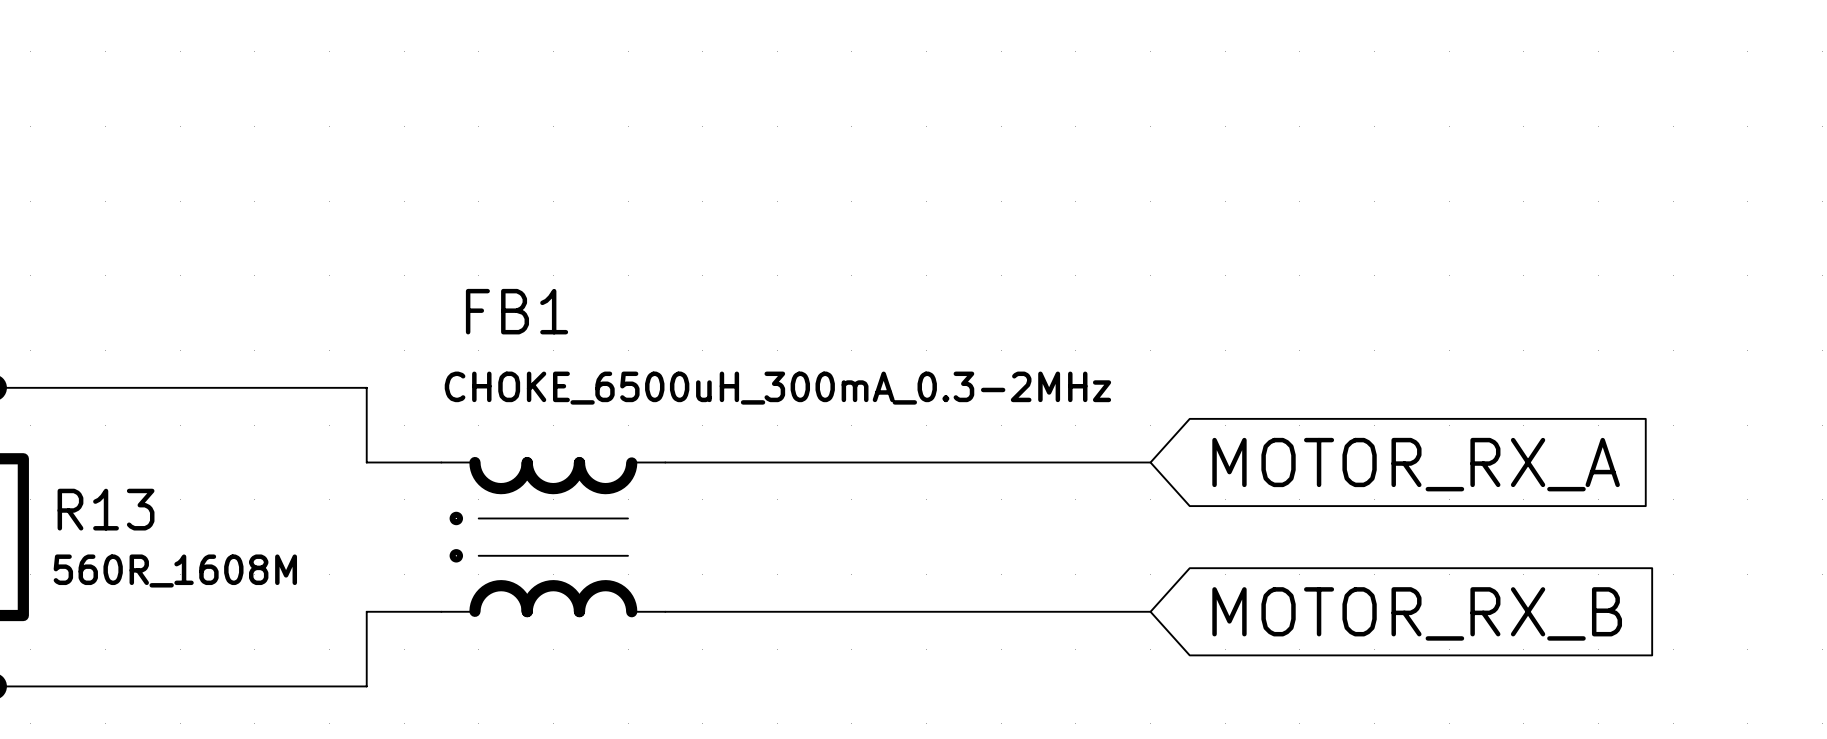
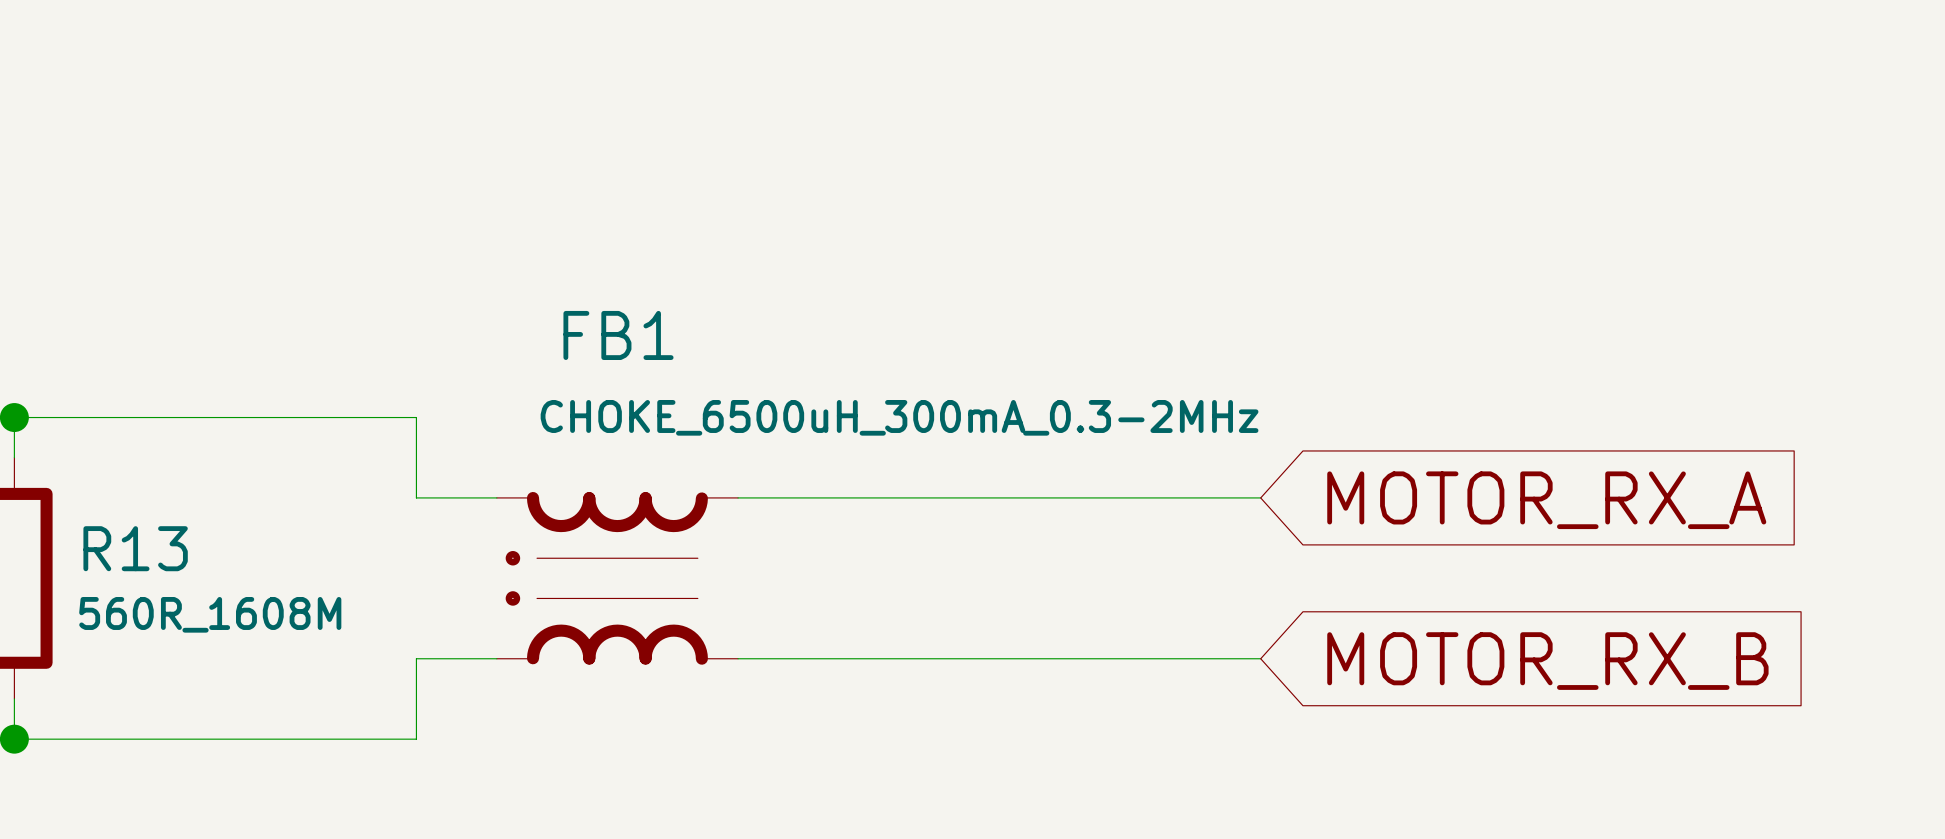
FB1 name position: FB1 (517, 311) -> FB1 (618, 335)
FB1 value position: CHOKE_6500uH_300mA_0.3-2MHz (777, 388) -> CHOKE_6500uH_300mA_0.3-2MHz (899, 417)

